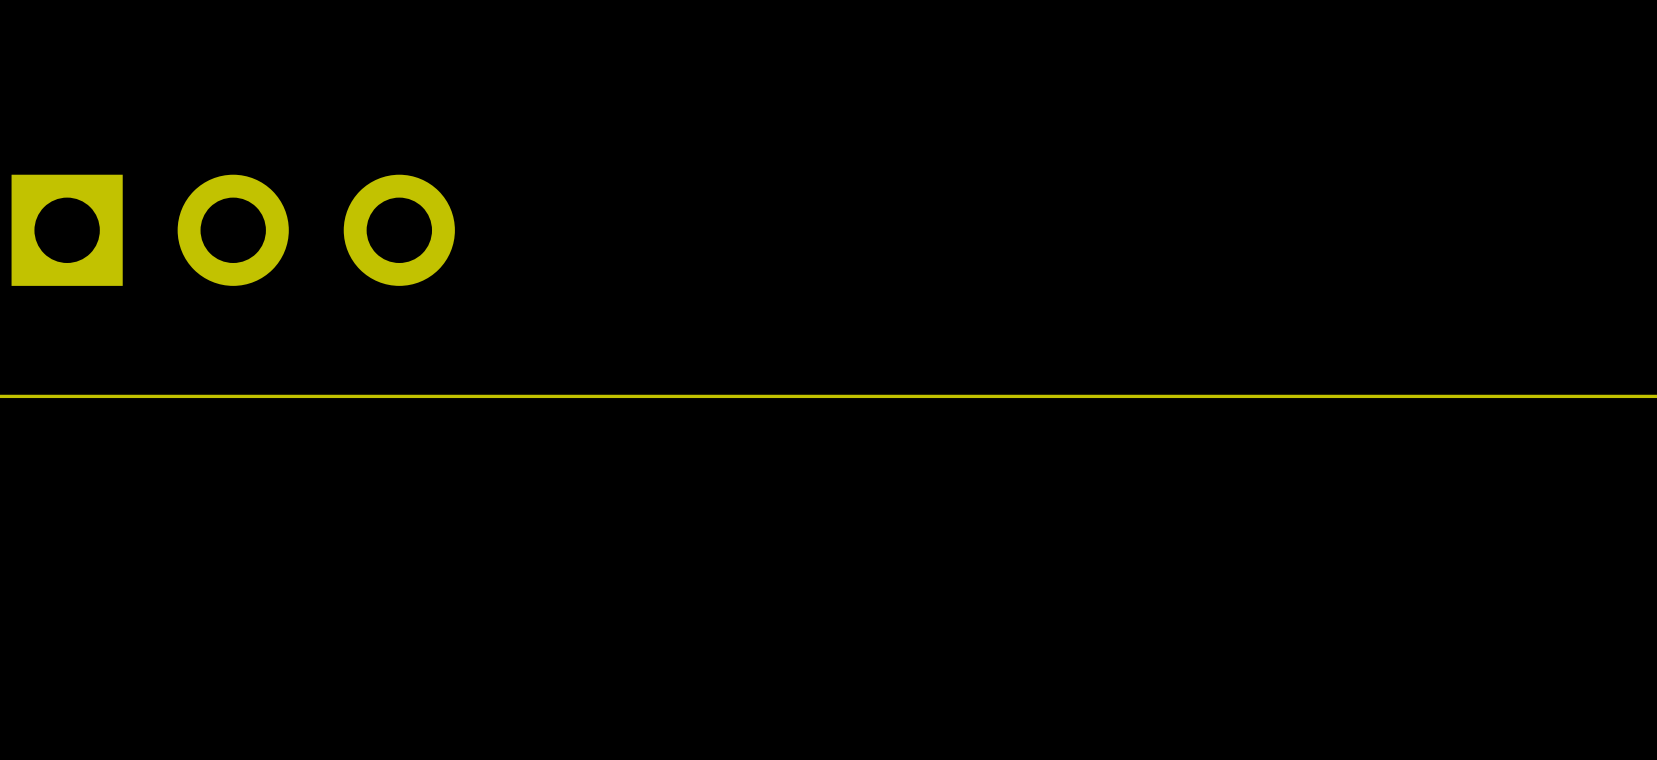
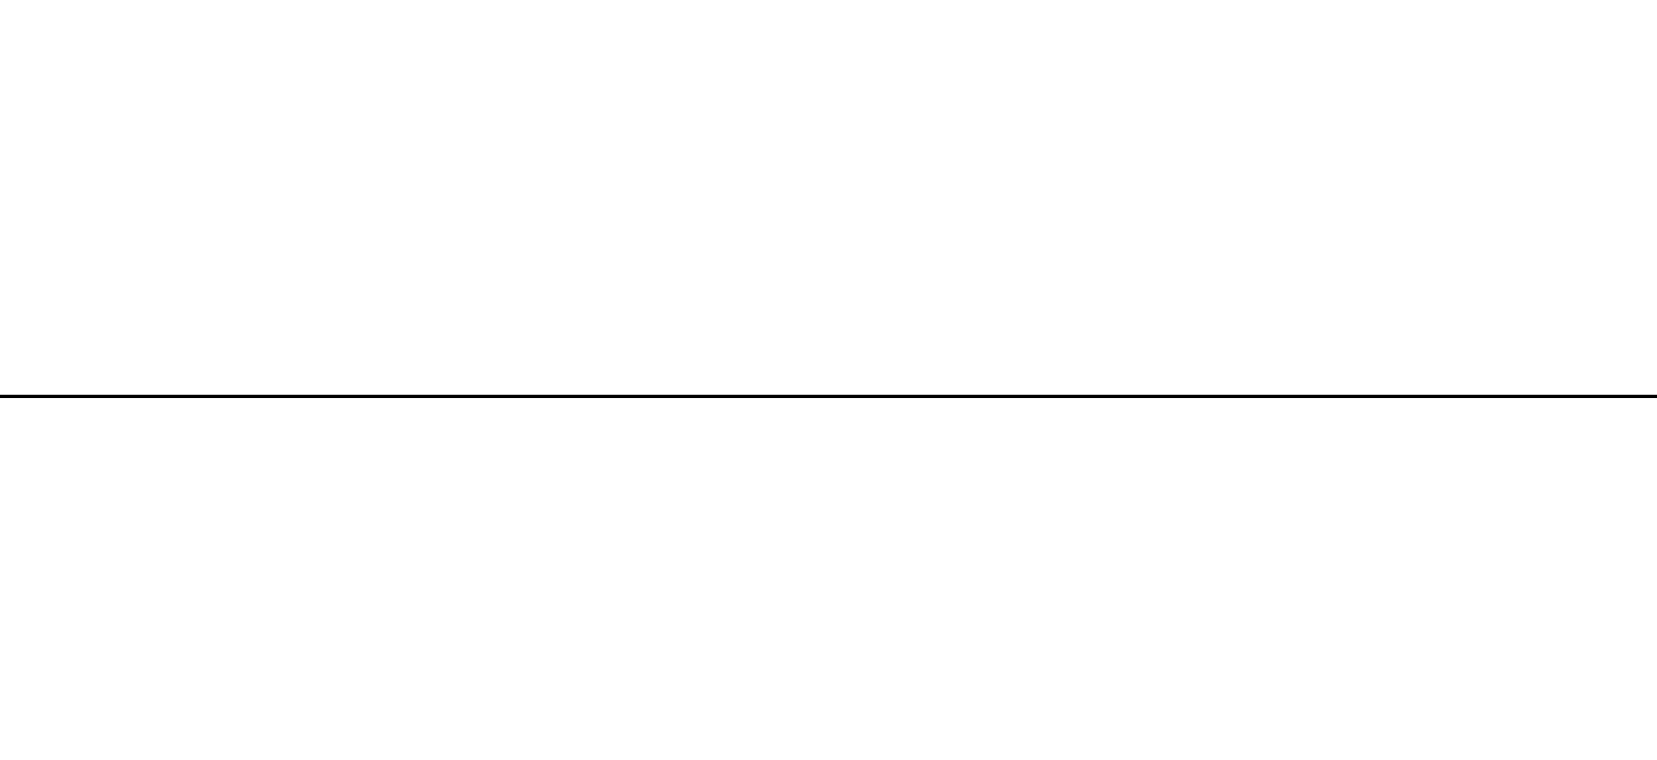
part: (233, 230) -> none

